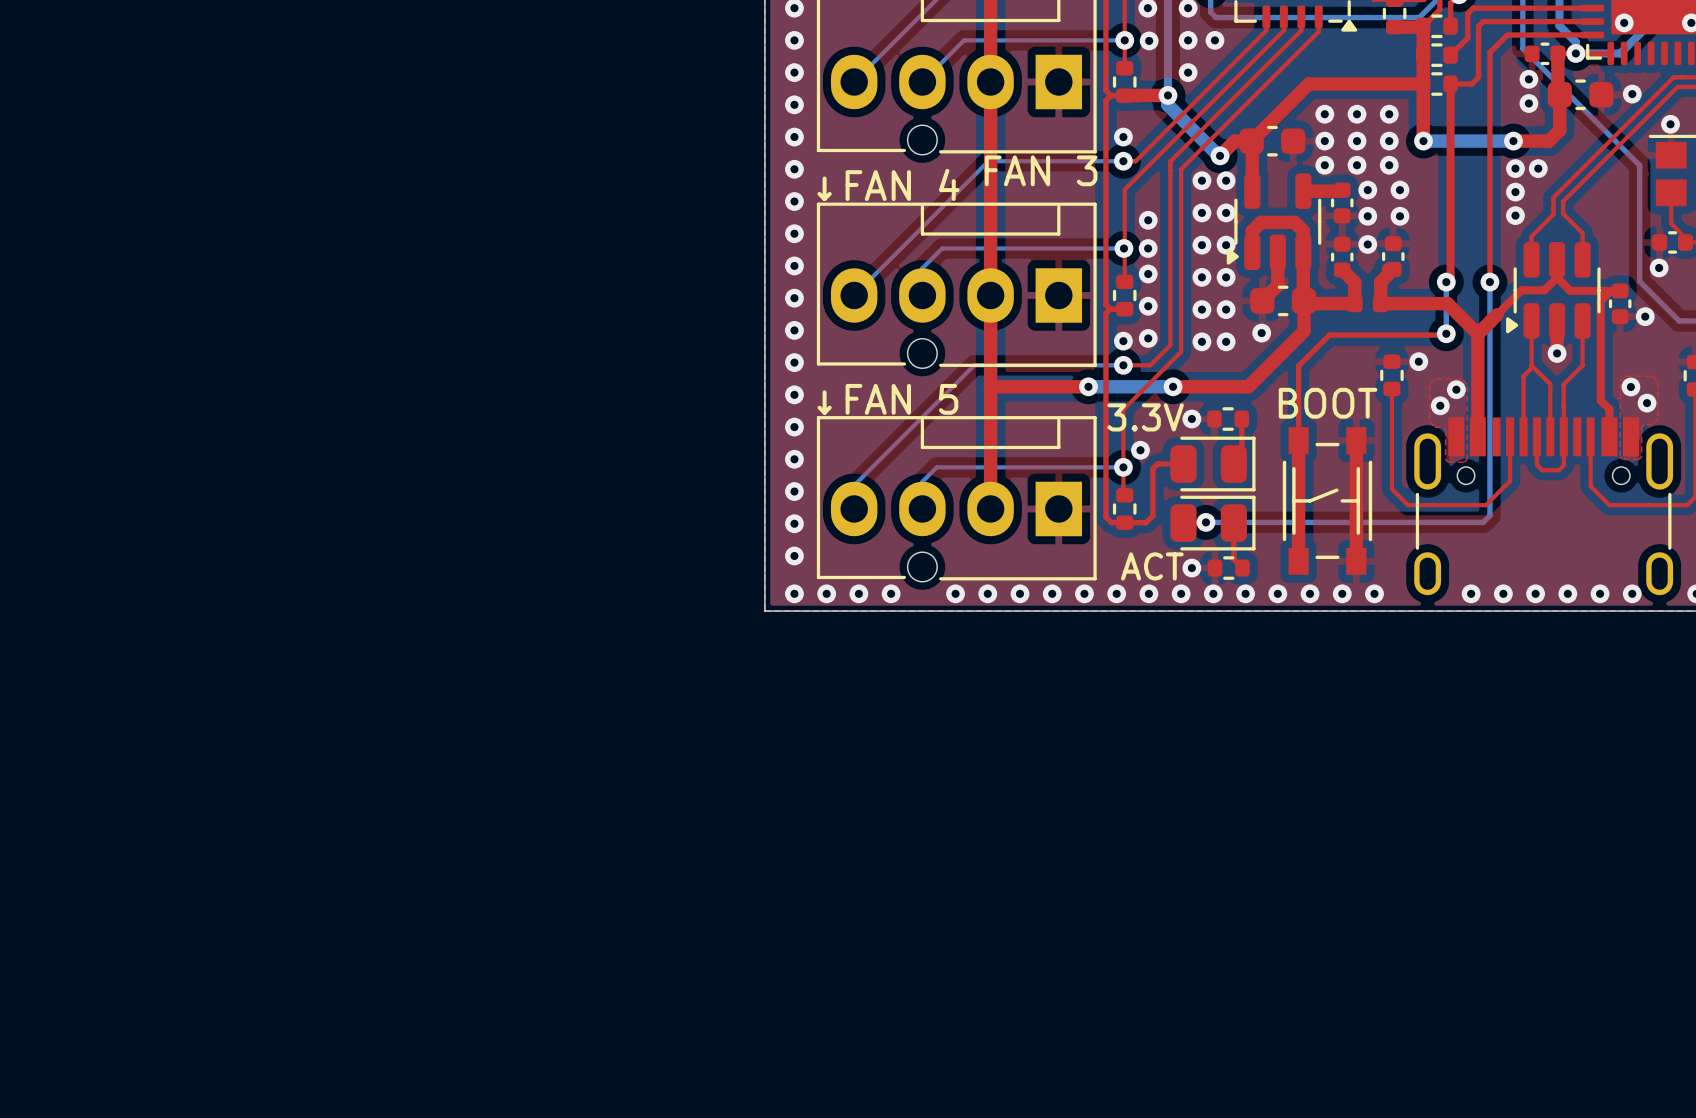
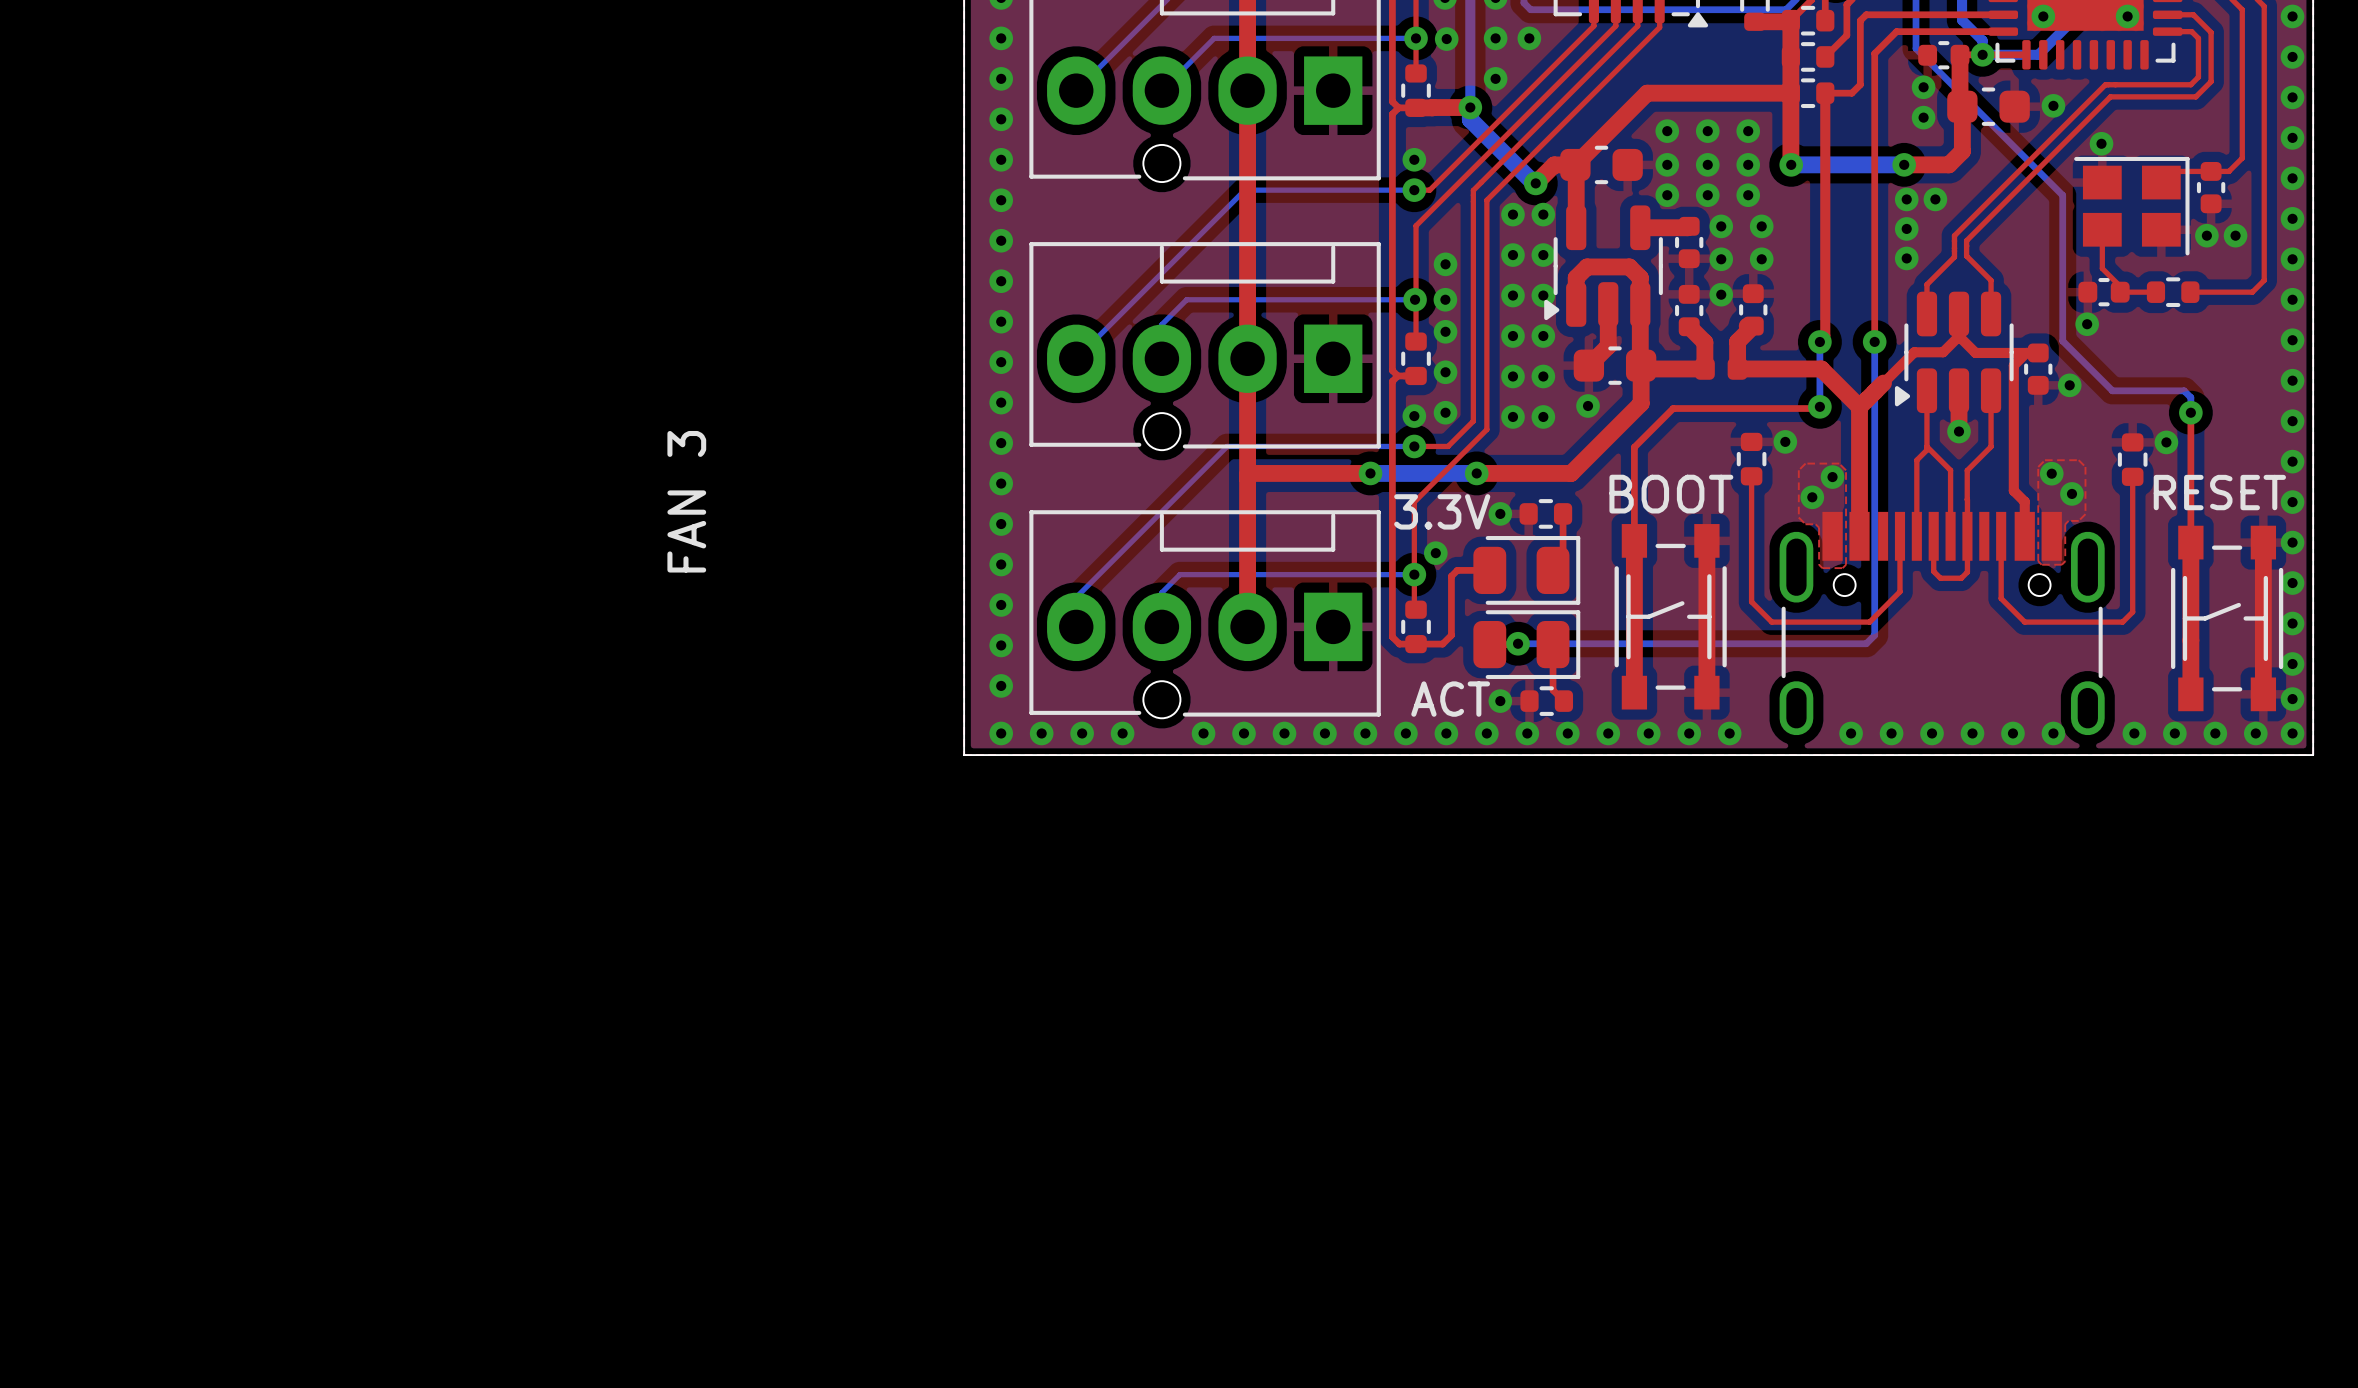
text rotation: 0° (1041, 170) -> 90° counterclockwise (686, 501)
text position: FAN 3 (1041, 170) -> FAN 3 (686, 501)
text: ↓FAN 4 (888, 184) -> none
text: ↓FAN 5 (887, 399) -> none

